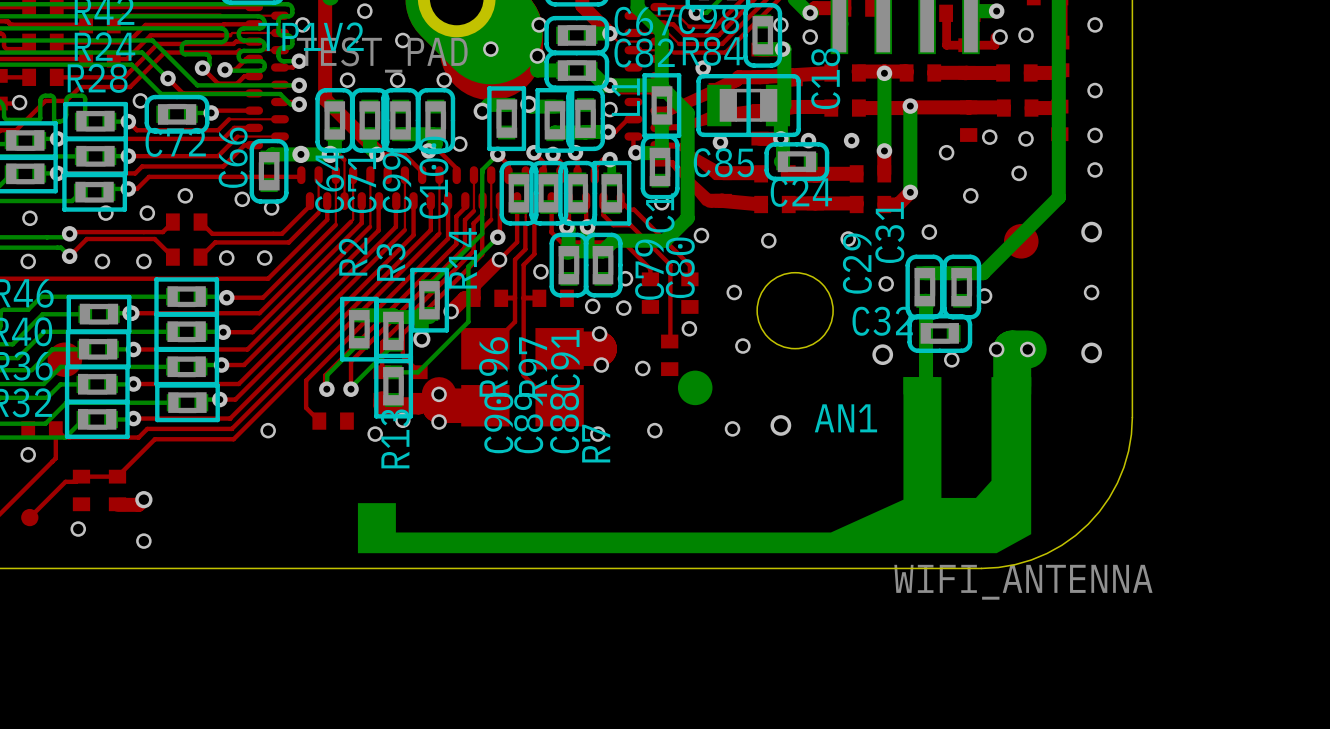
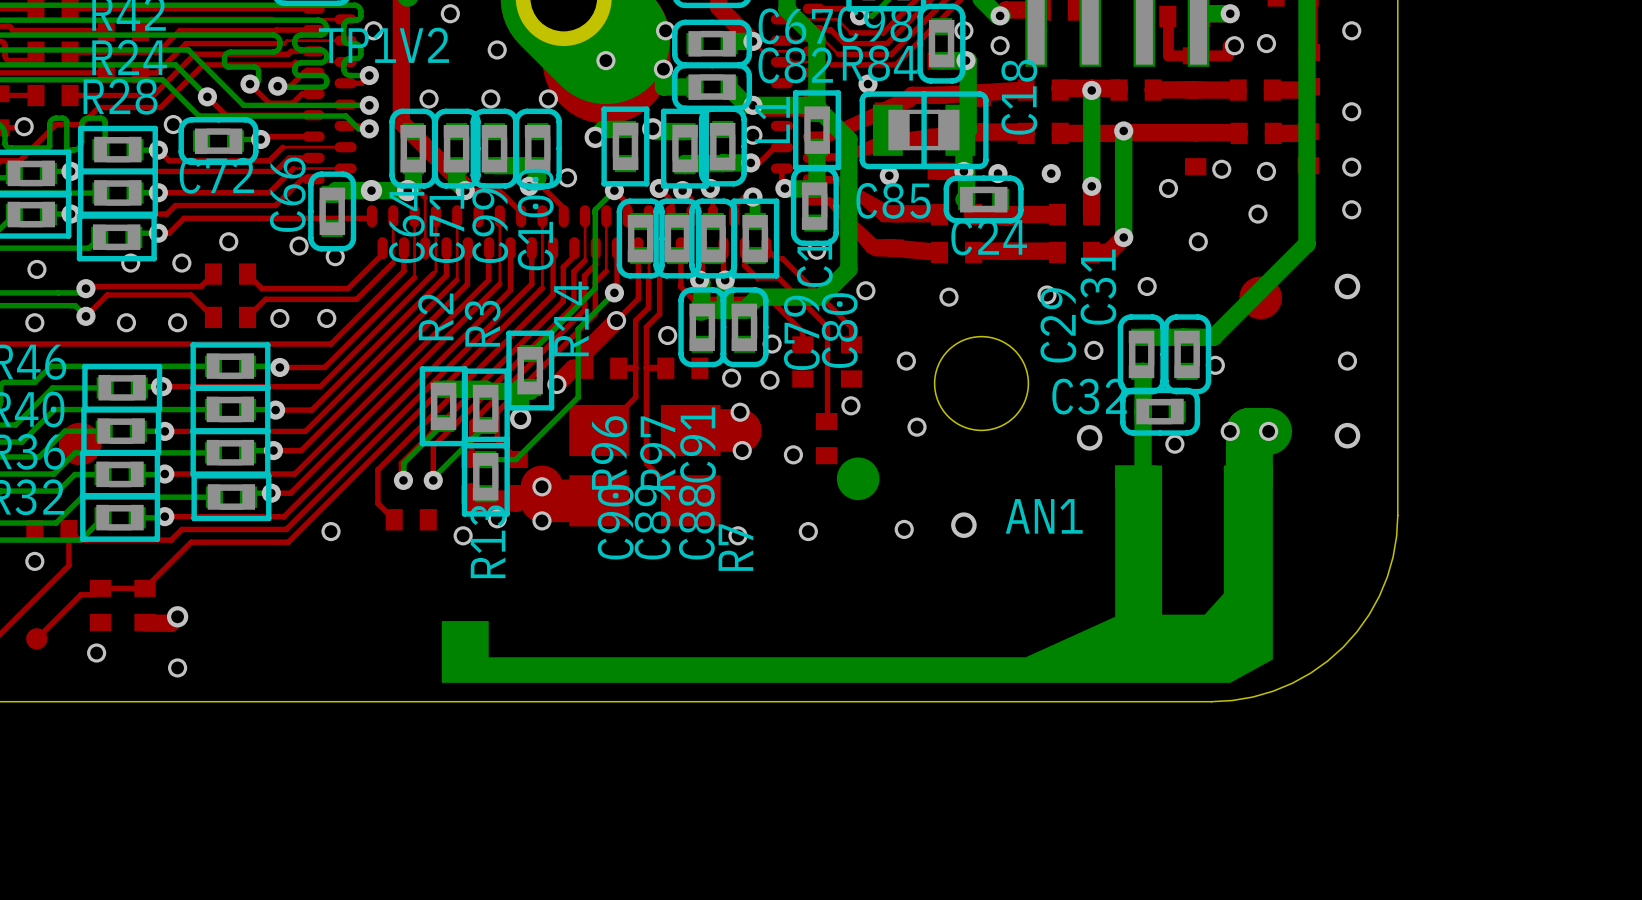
TP1V2 value: TEST_PAD (382, 55) -> none
AN1 value: WIFI_ANTENNA (1023, 582) -> none

